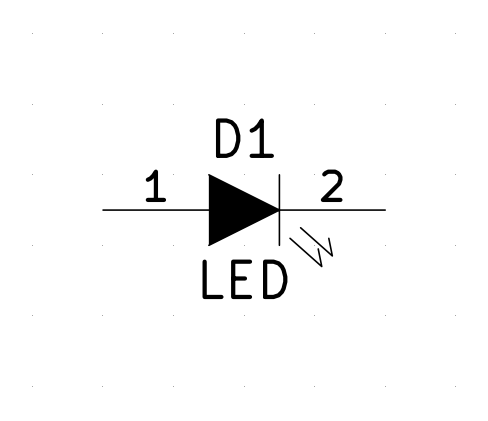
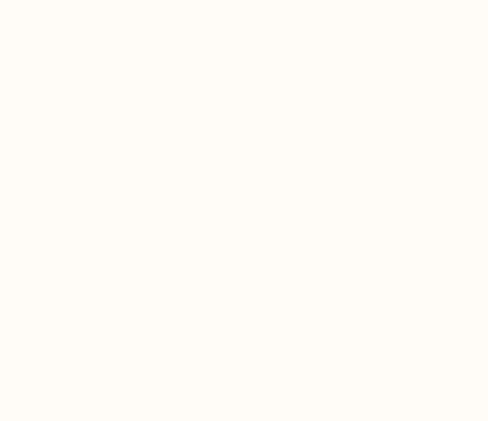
D1: LED (244, 220) -> none

